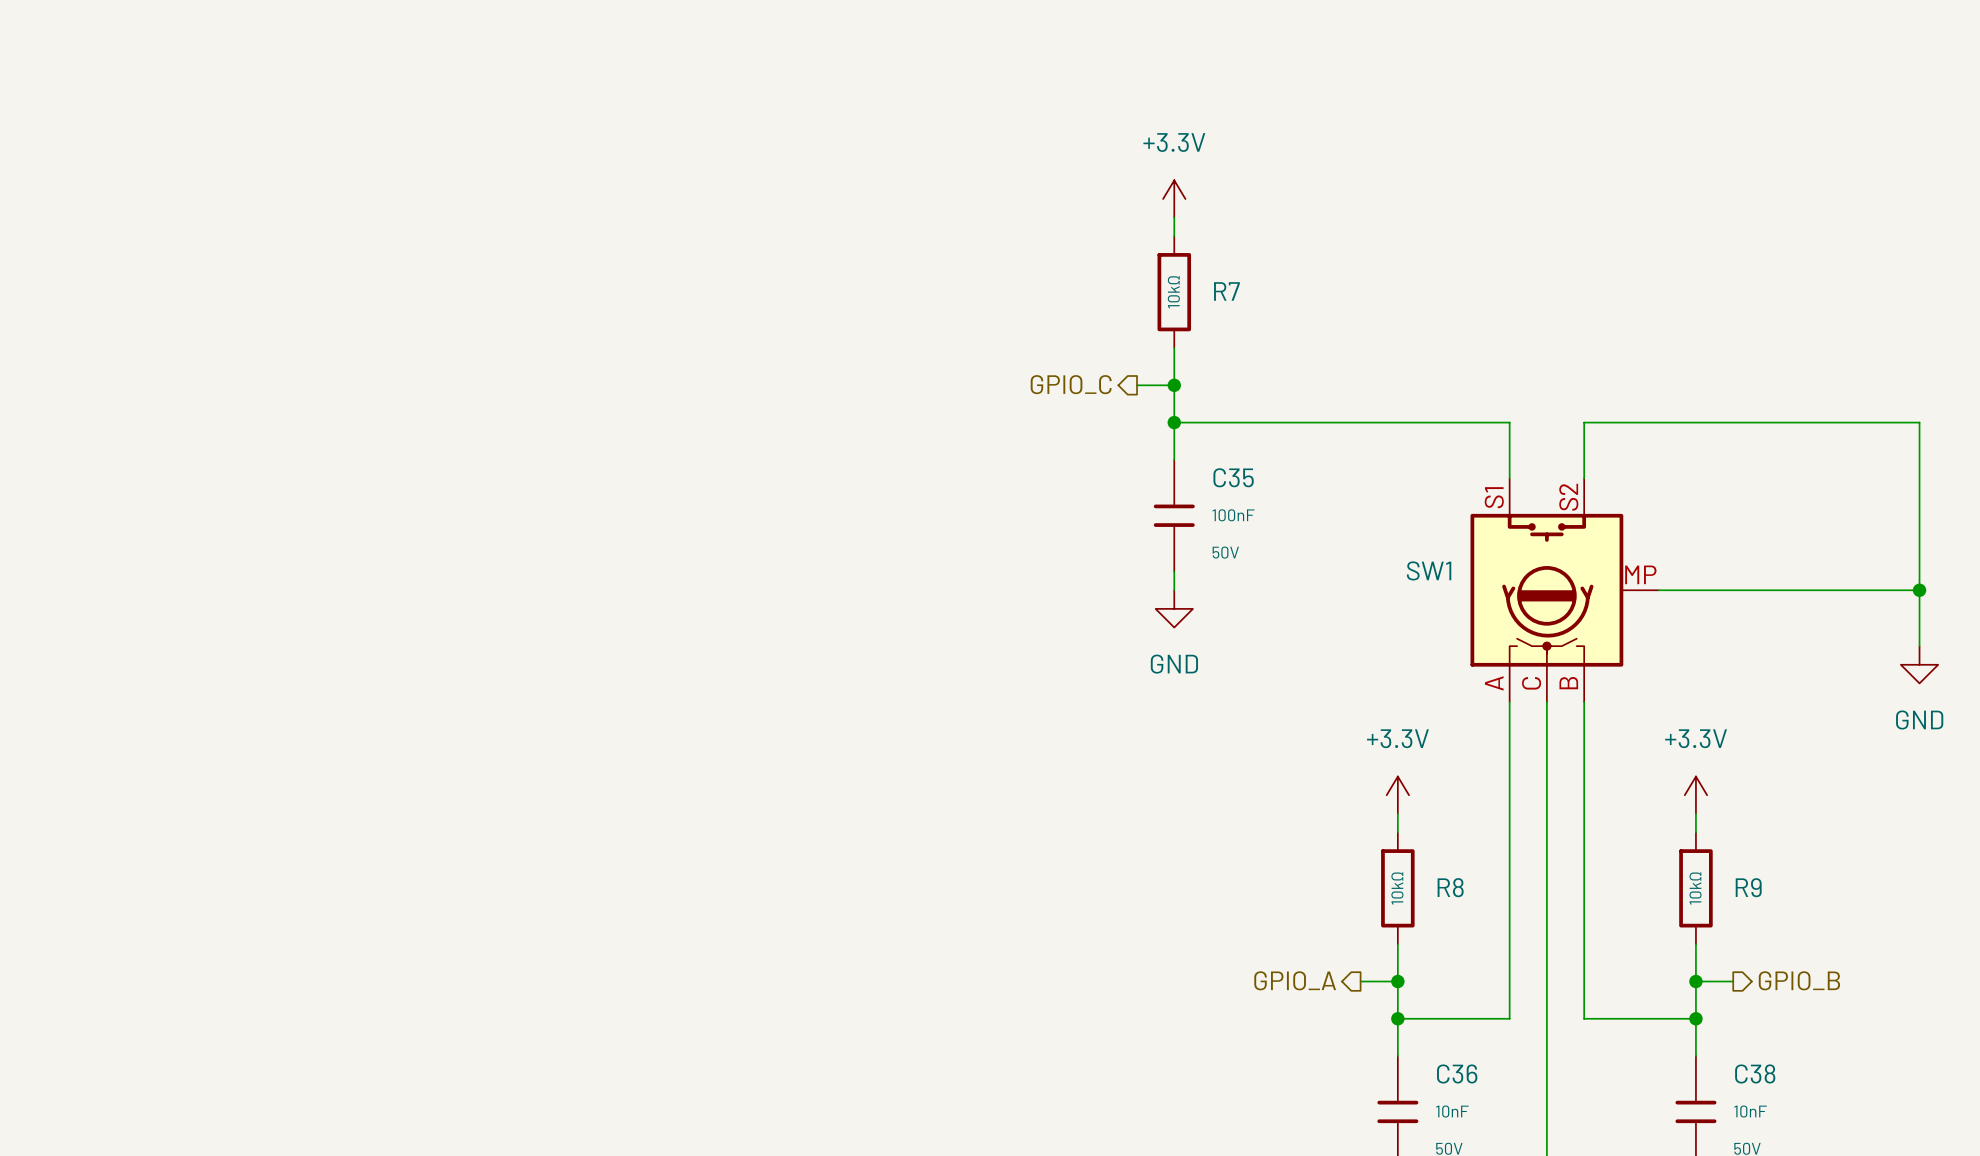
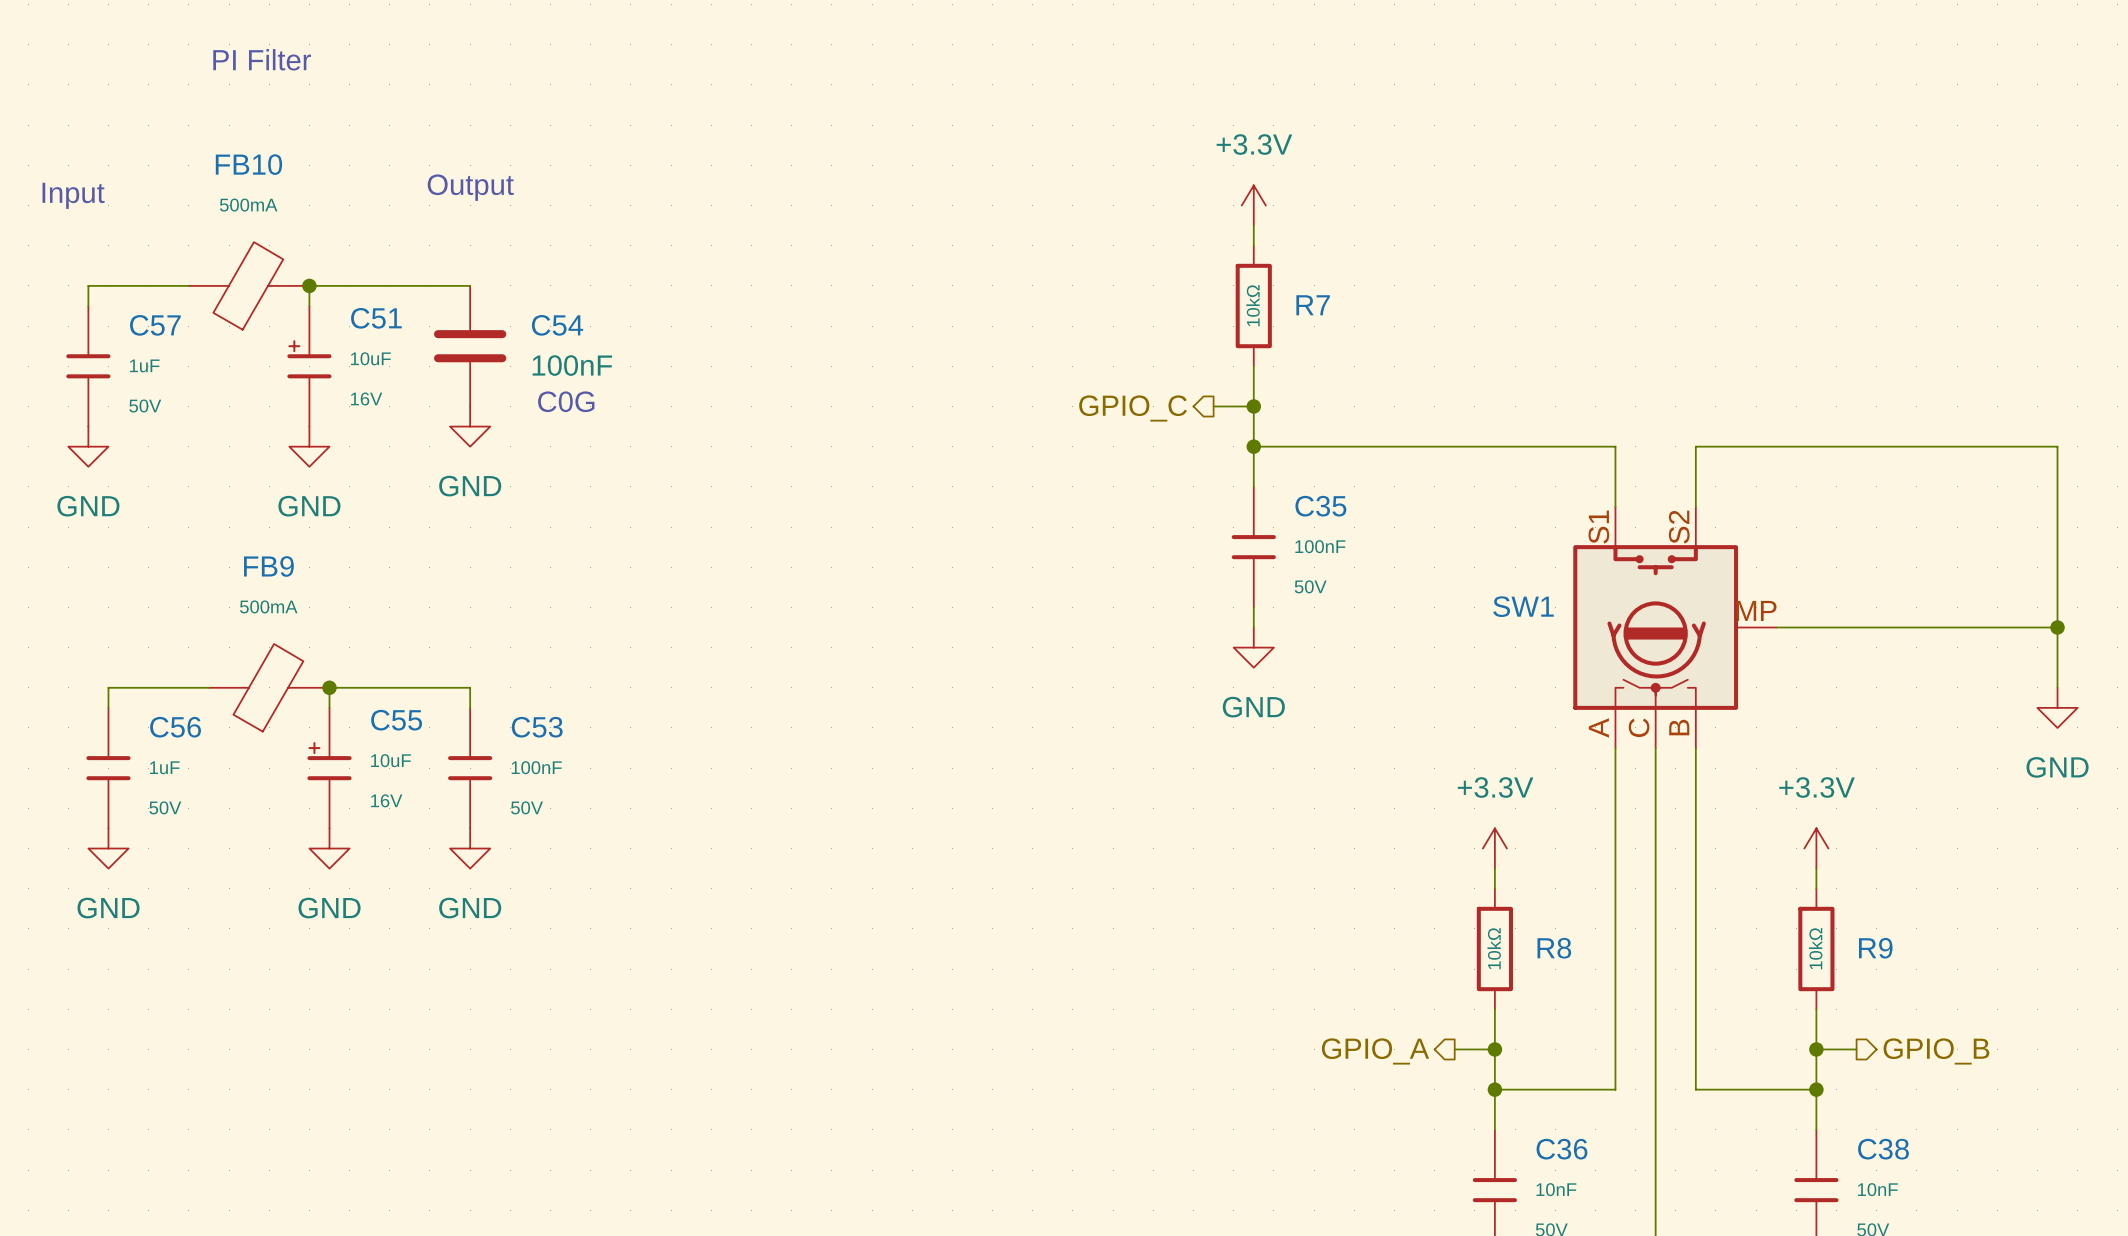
text: none -> PI Filter (262, 59)
text: none -> Output (470, 187)
text: none -> Input (73, 195)
wire: none -> (188, 285) (88, 285) (88, 306)
FB10: none -> (249, 285)
junction: none -> (309, 285)
wire: none -> (470, 285) (309, 285) (309, 306)
C54: none -> 100nF (470, 346)
C57: none -> 1uF (88, 366)
C51: none -> 10uF (309, 366)
text: none -> C0G (566, 401)
power symbol: none -> GND (470, 426)
power symbol: none -> GND (88, 446)
power symbol: none -> GND (309, 446)
wire: none -> (208, 687) (108, 687) (108, 707)
FB9: none -> (269, 687)
junction: none -> (329, 687)
wire: none -> (329, 707) (329, 687) (470, 687) (470, 707)
C56: none -> 1uF (108, 768)
C55: none -> 10uF (329, 768)
C53: none -> 100nF (470, 768)
power symbol: none -> GND (108, 848)
power symbol: none -> GND (329, 848)
power symbol: none -> GND (470, 848)

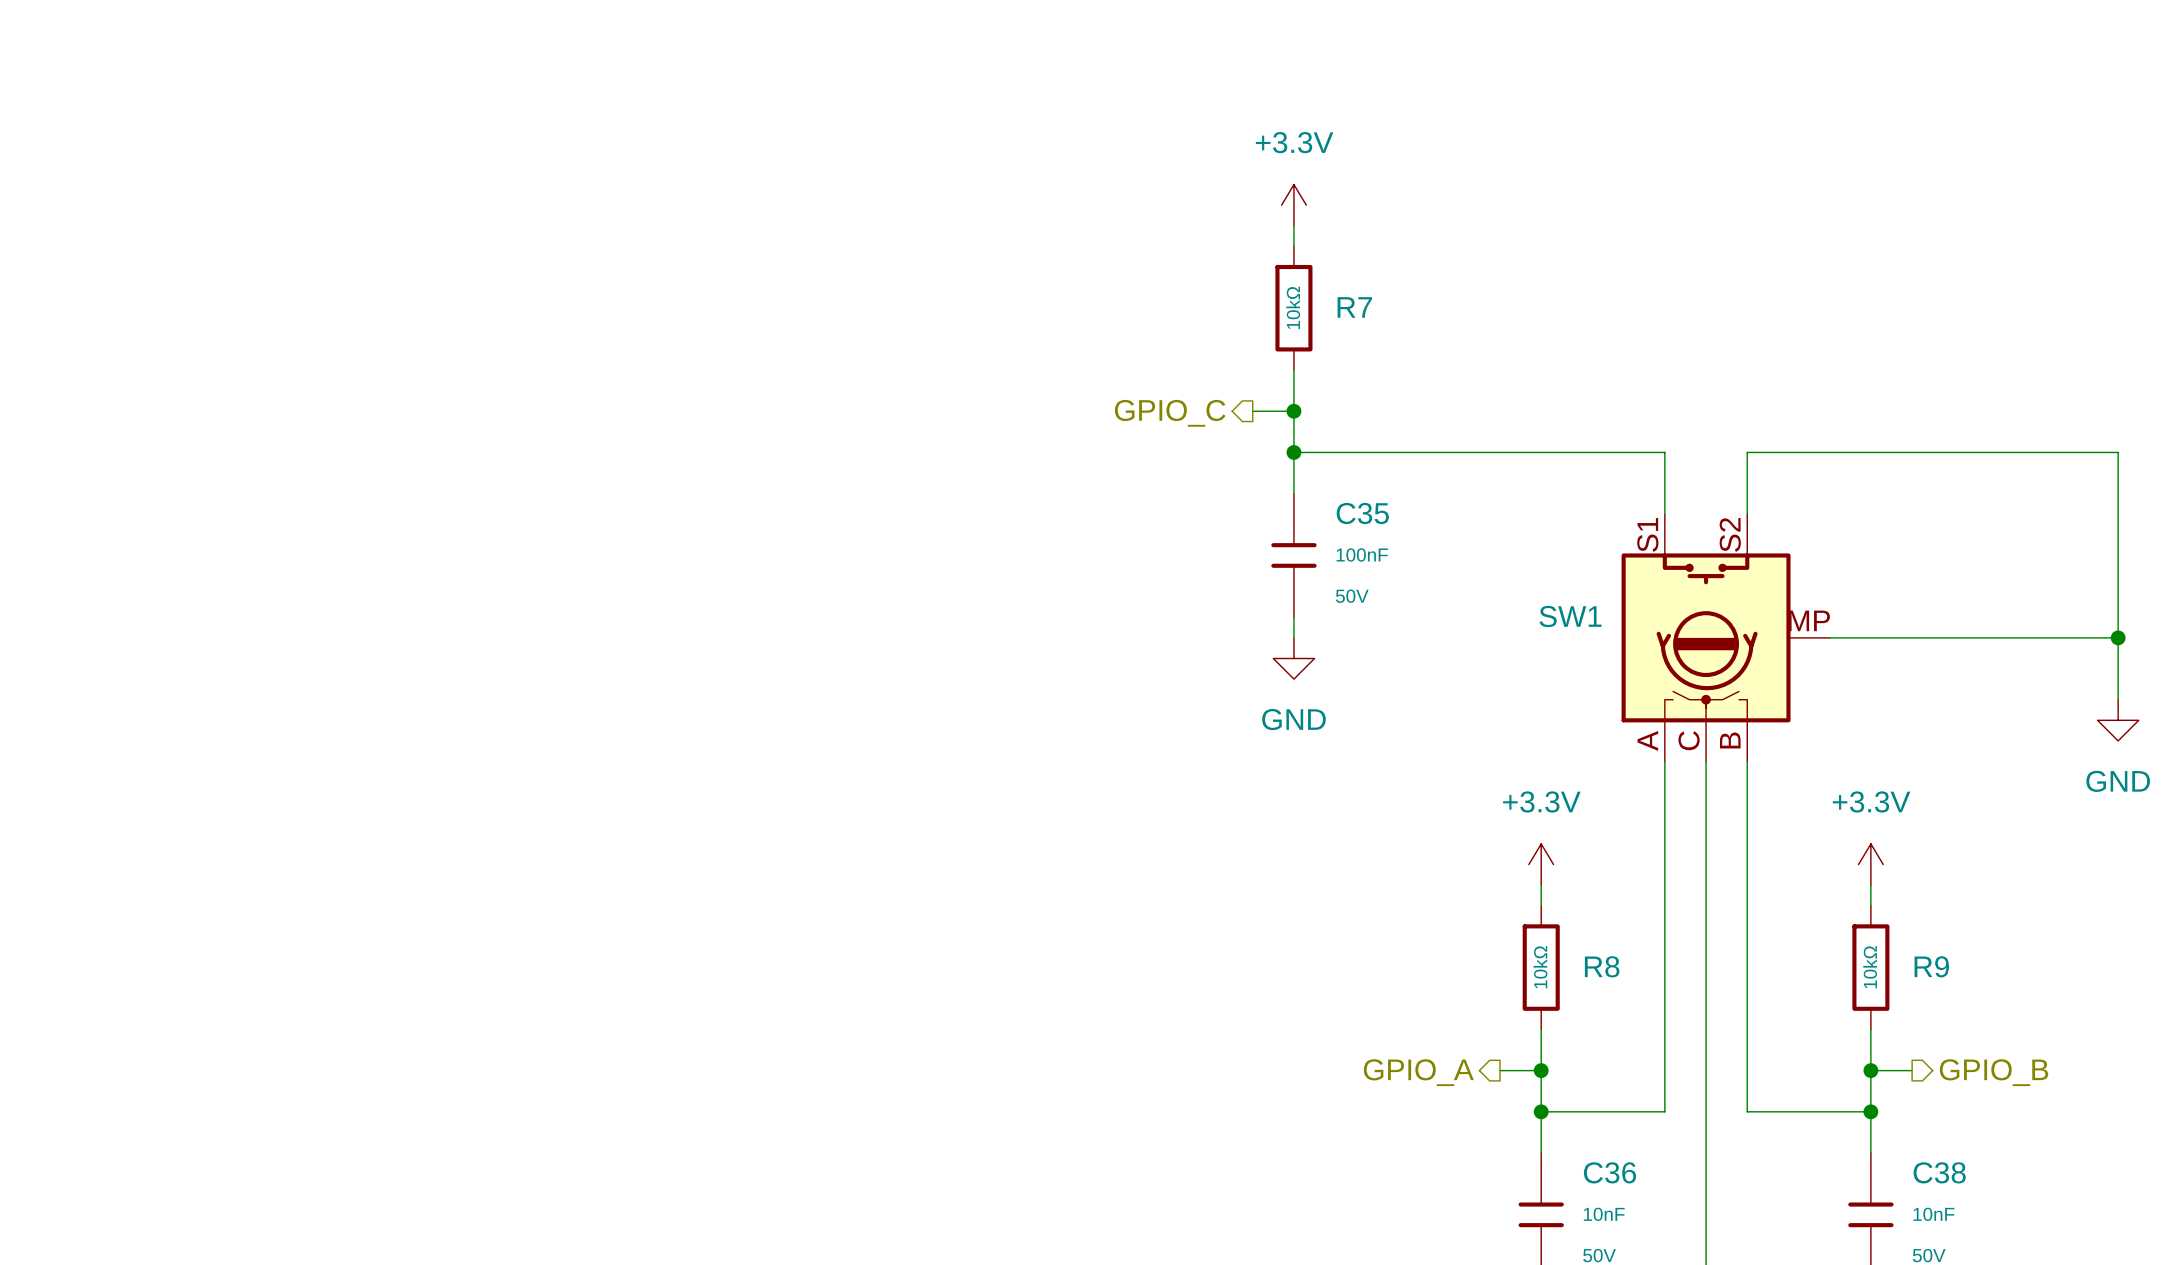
text: PI Filter (262, 59) -> none
text: Output (470, 187) -> none
text: Input (73, 195) -> none
wire: (188, 285) (88, 285) (88, 306) -> none
FB10: (249, 285) -> none
junction: (309, 285) -> none
wire: (470, 285) (309, 285) (309, 306) -> none
C54: 100nF (470, 346) -> none
C57: 1uF (88, 366) -> none
C51: 10uF (309, 366) -> none
text: C0G (566, 401) -> none
power symbol: GND (470, 426) -> none
power symbol: GND (88, 446) -> none
power symbol: GND (309, 446) -> none
wire: (208, 687) (108, 687) (108, 707) -> none
FB9: (269, 687) -> none
junction: (329, 687) -> none
wire: (329, 707) (329, 687) (470, 687) (470, 707) -> none
C56: 1uF (108, 768) -> none
C55: 10uF (329, 768) -> none
C53: 100nF (470, 768) -> none
power symbol: GND (108, 848) -> none
power symbol: GND (329, 848) -> none
power symbol: GND (470, 848) -> none

